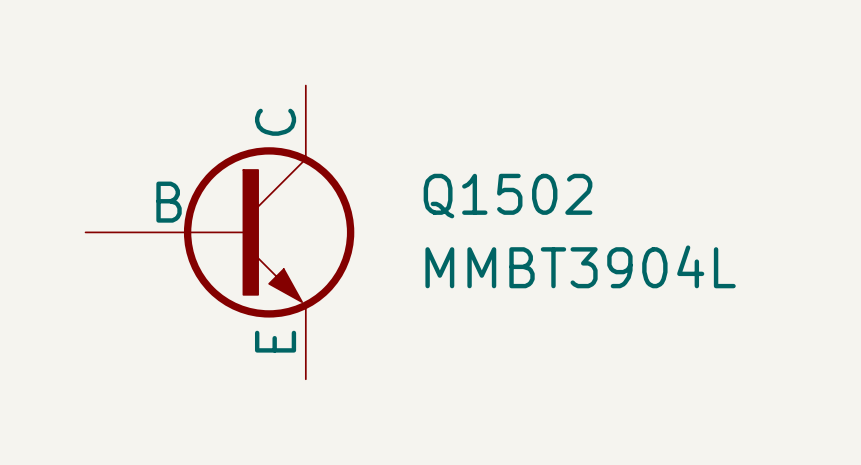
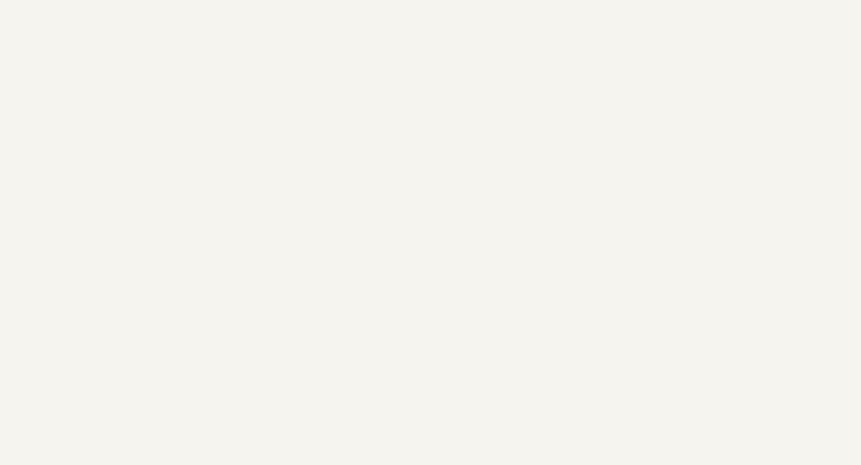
Q1502: MMBT3904L (219, 232) -> none

